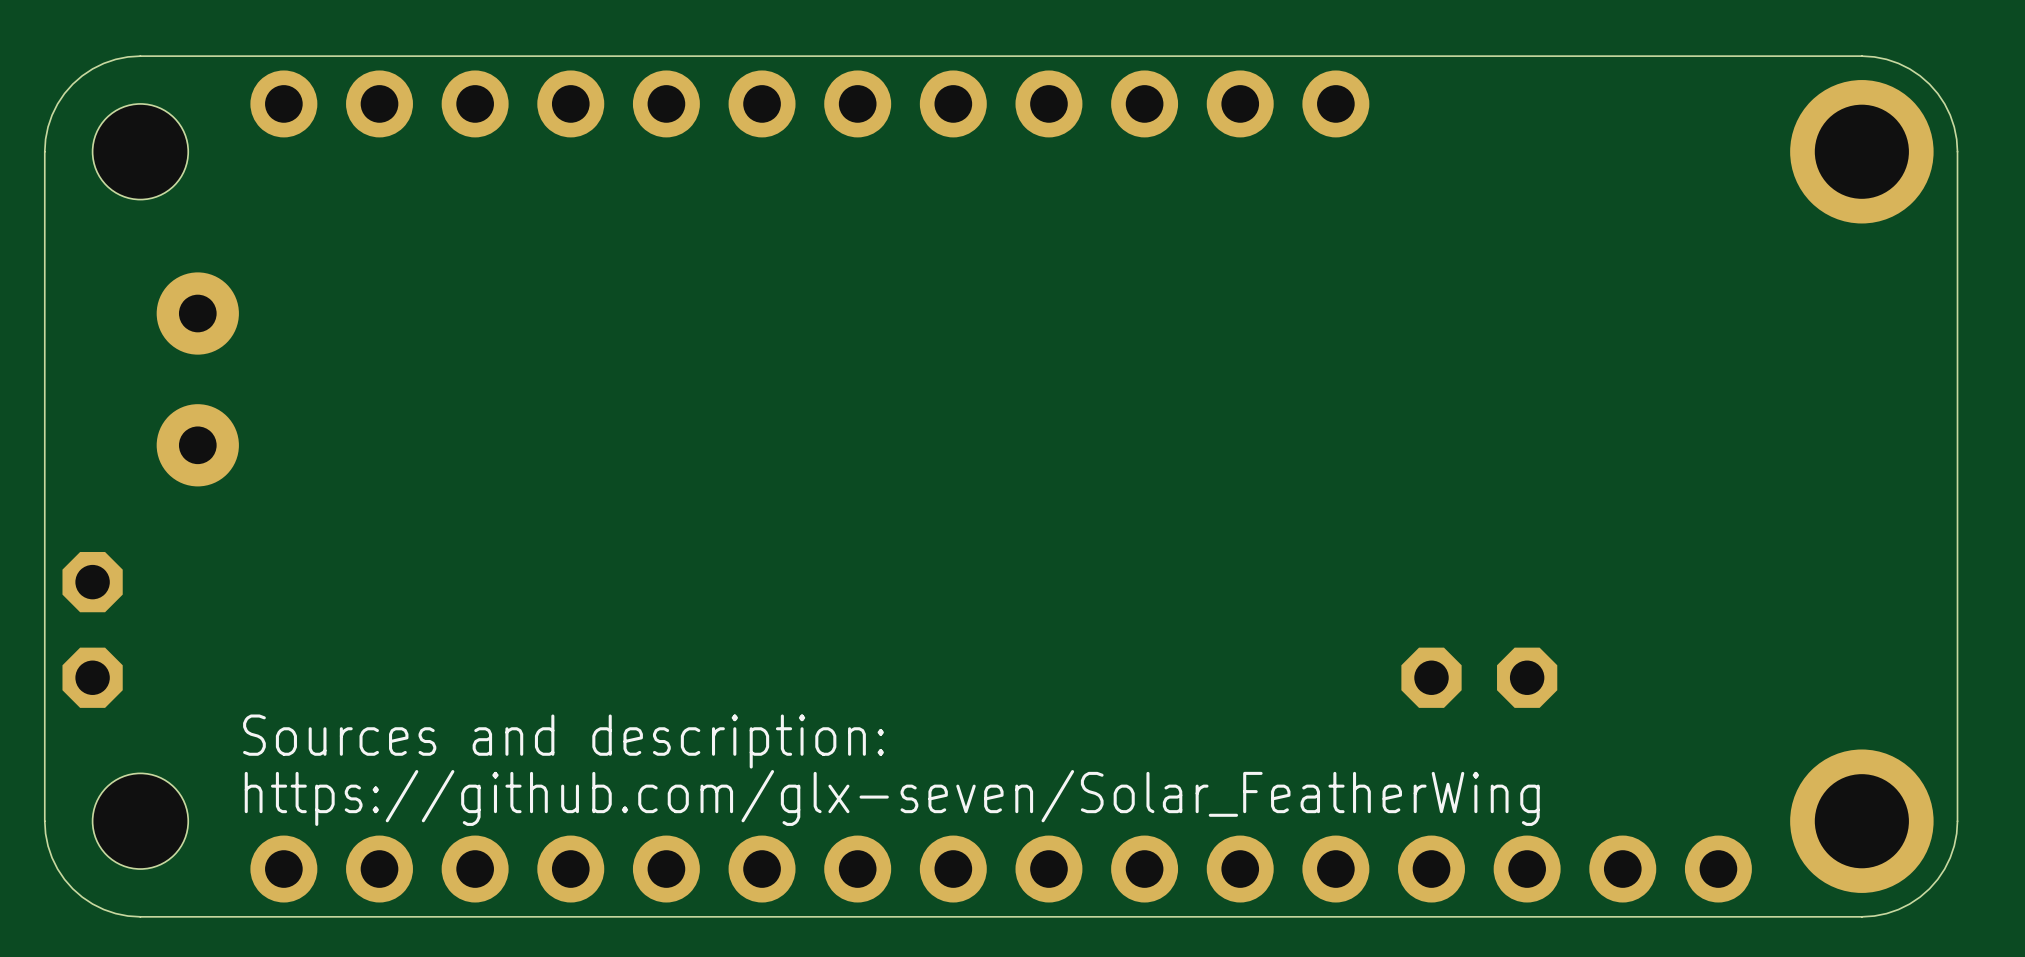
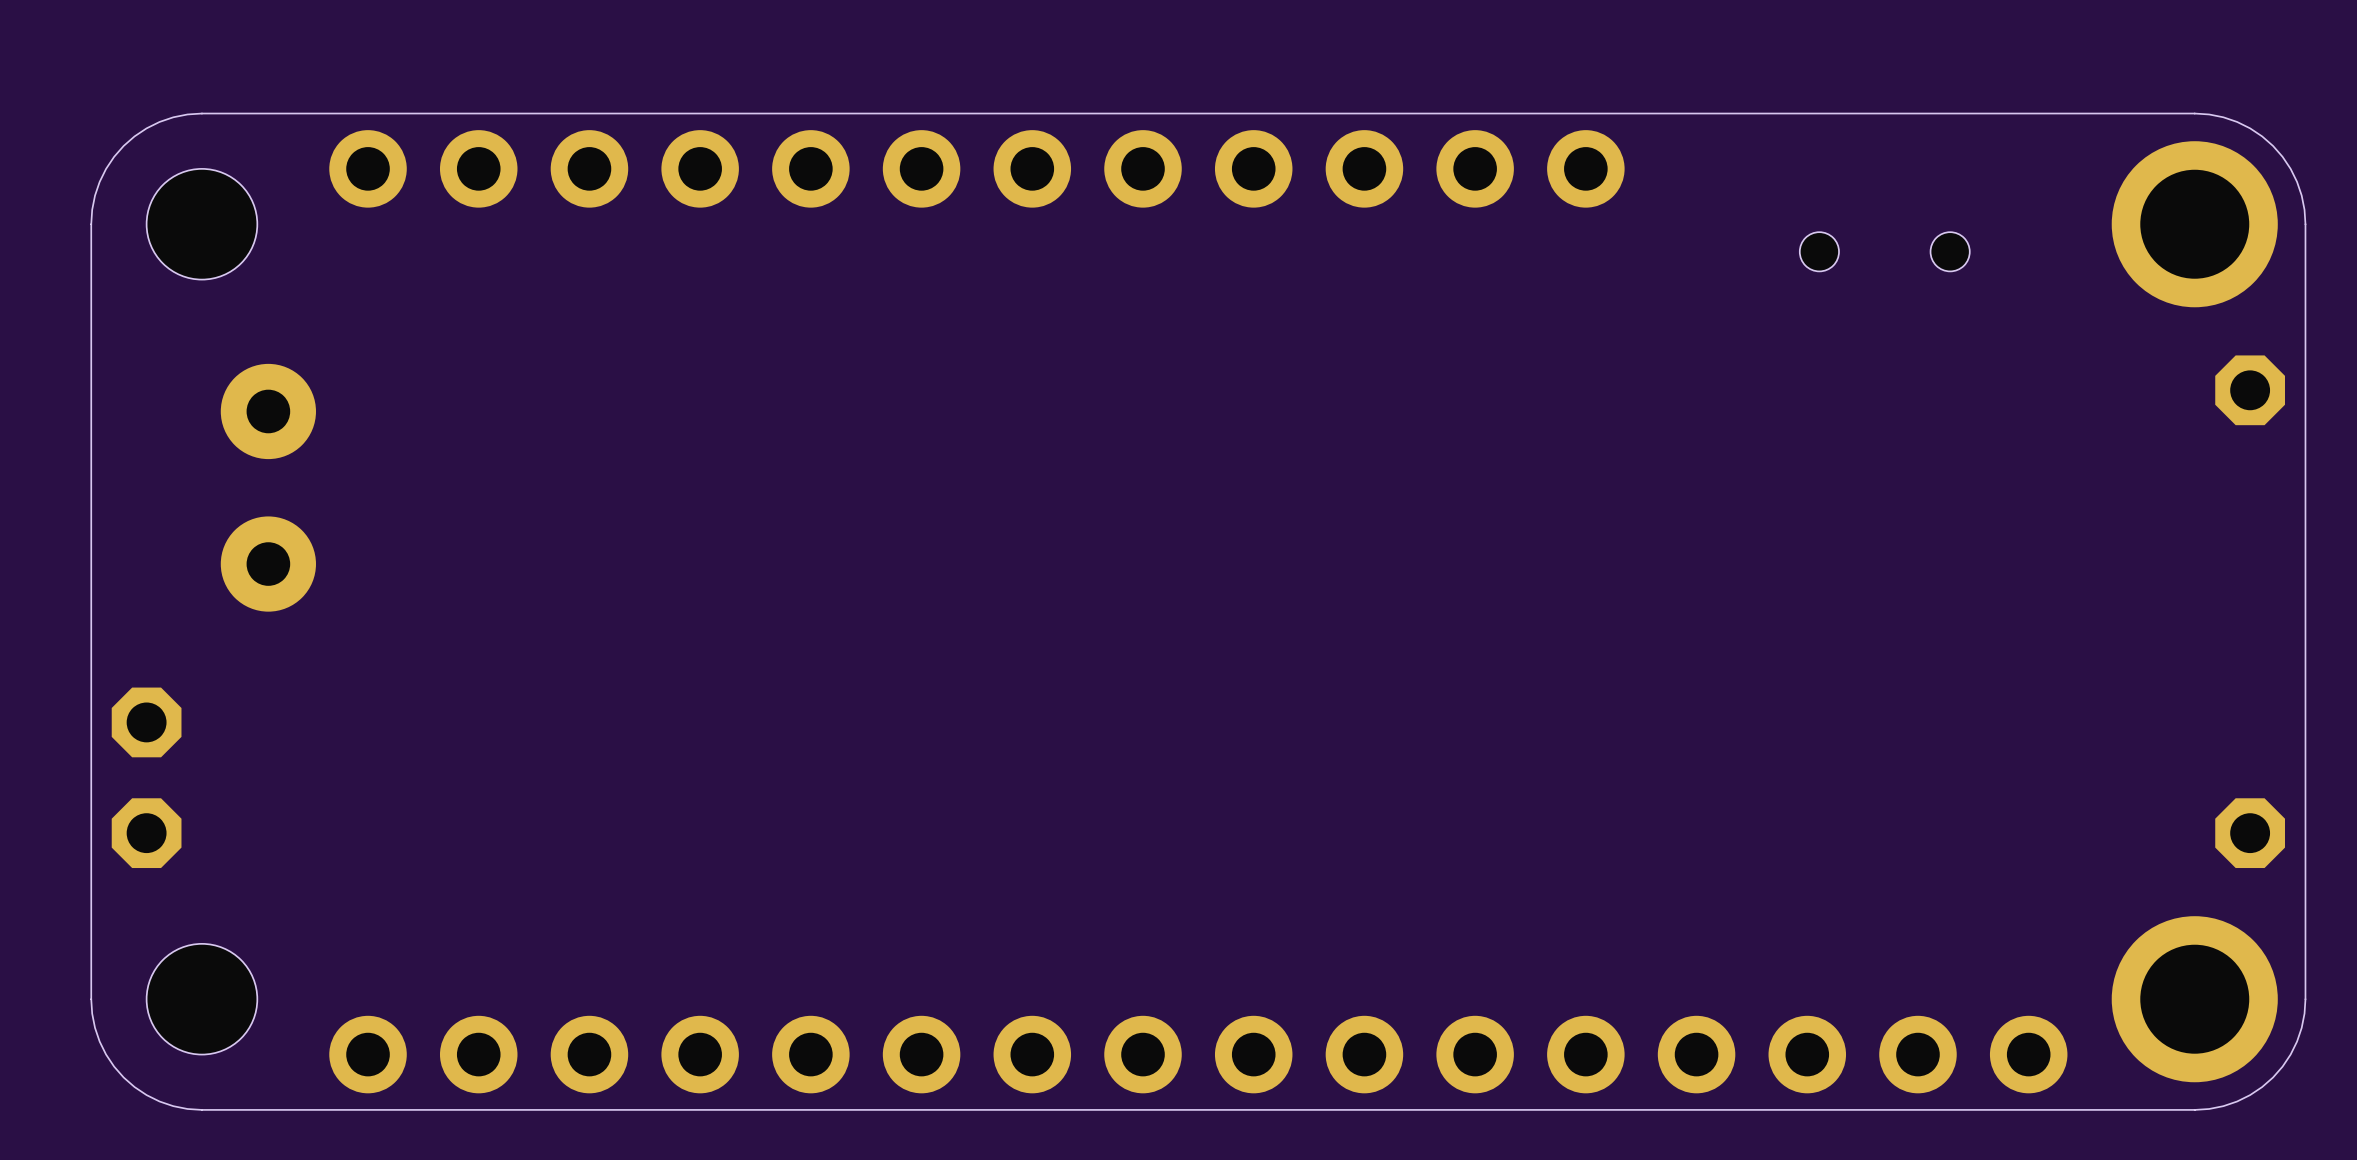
part: none -> (1884, 251)
part: none -> (2250, 390)
part: (1431, 677) -> none
part: (1527, 677) -> none
part: none -> (2250, 833)
text: Sources and description: (563, 741) -> none
text: https://github.com/glx-seven/Solar_FeatherWing (892, 797) -> none

